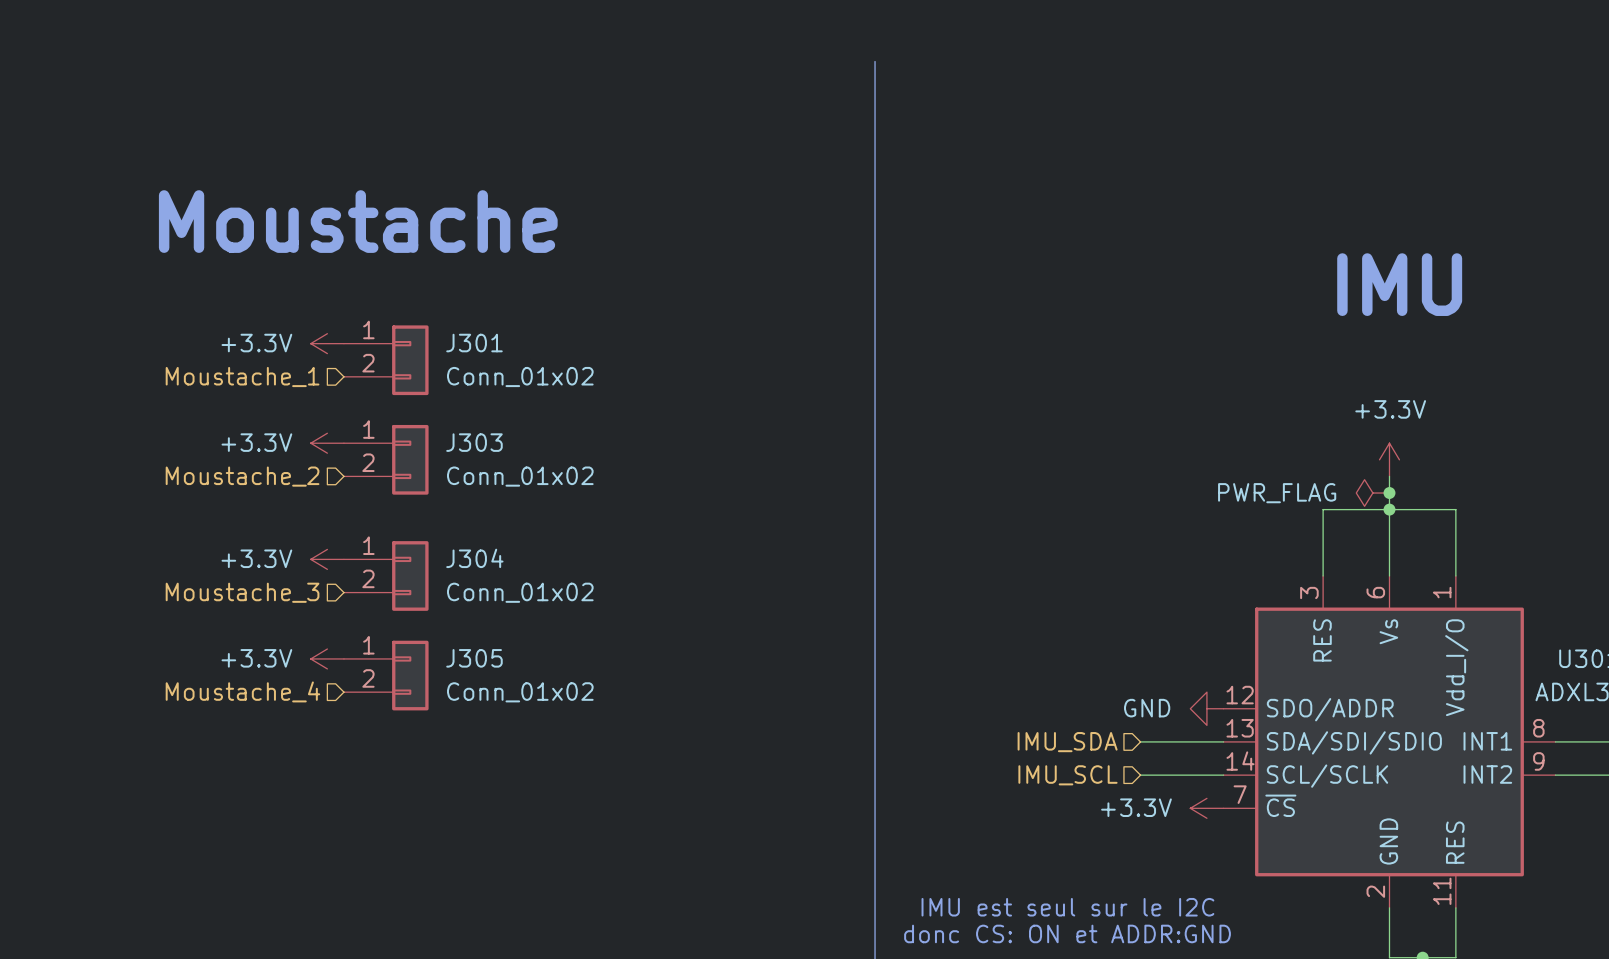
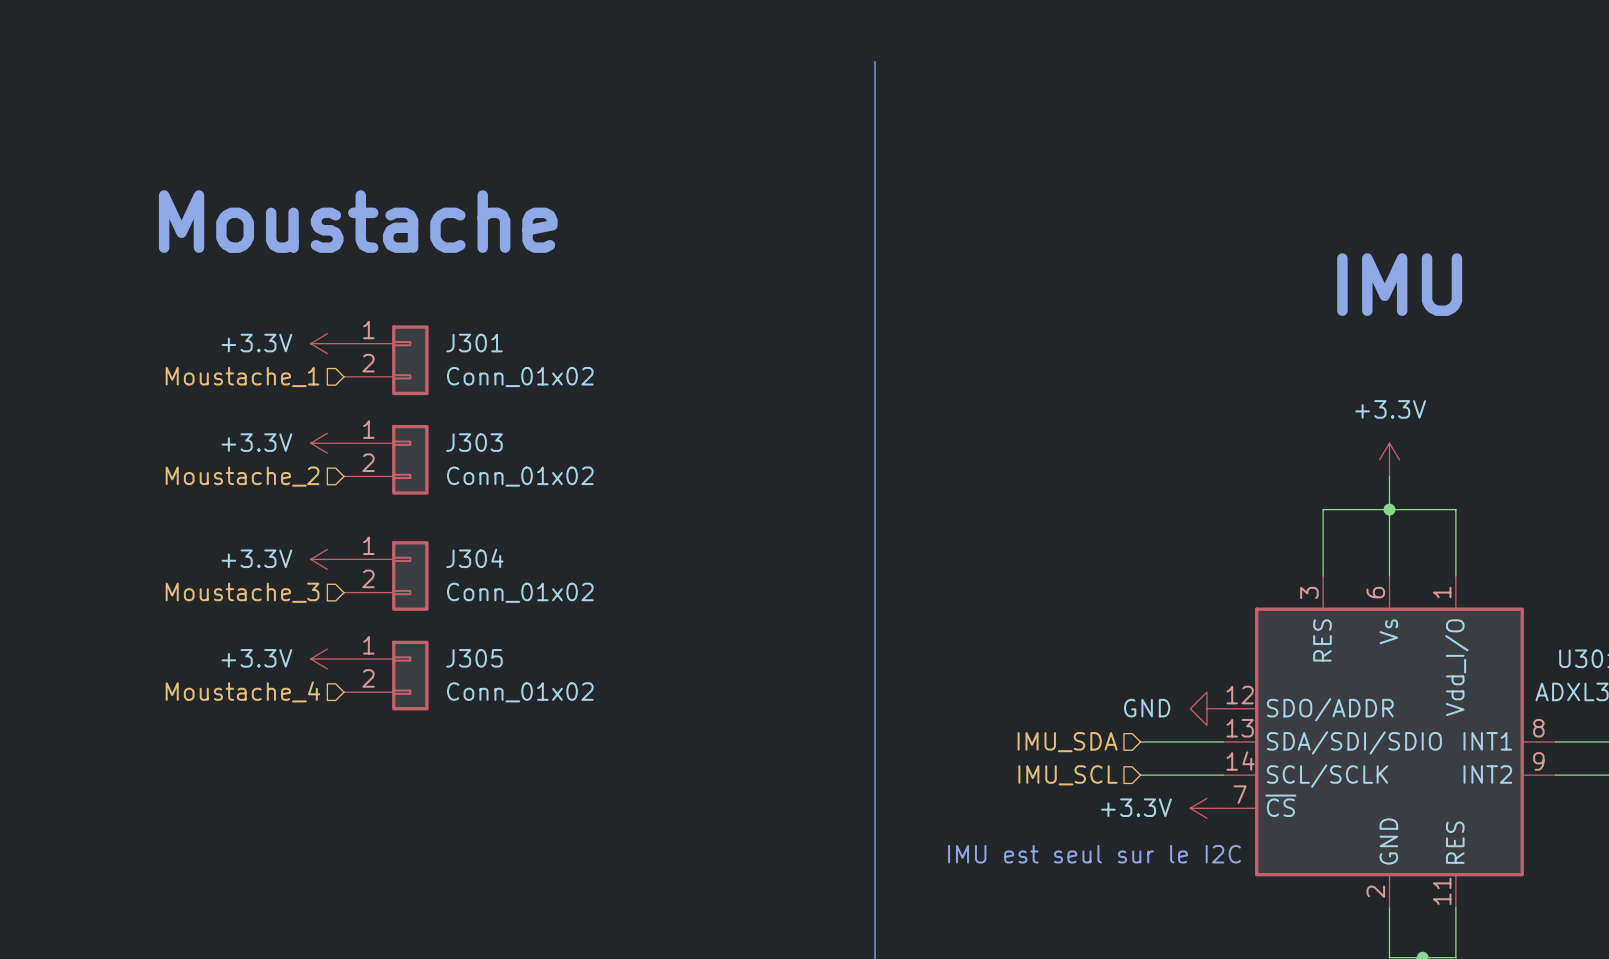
power symbol: PWR_FLAG (1372, 493) -> none
junction: (1389, 493) -> none
text position: IMU est seul sur le I2C (1067, 907) -> IMU est seul sur le I2C (1094, 854)
text: donc CS: ON et ADDR:GND (1067, 933) -> none

